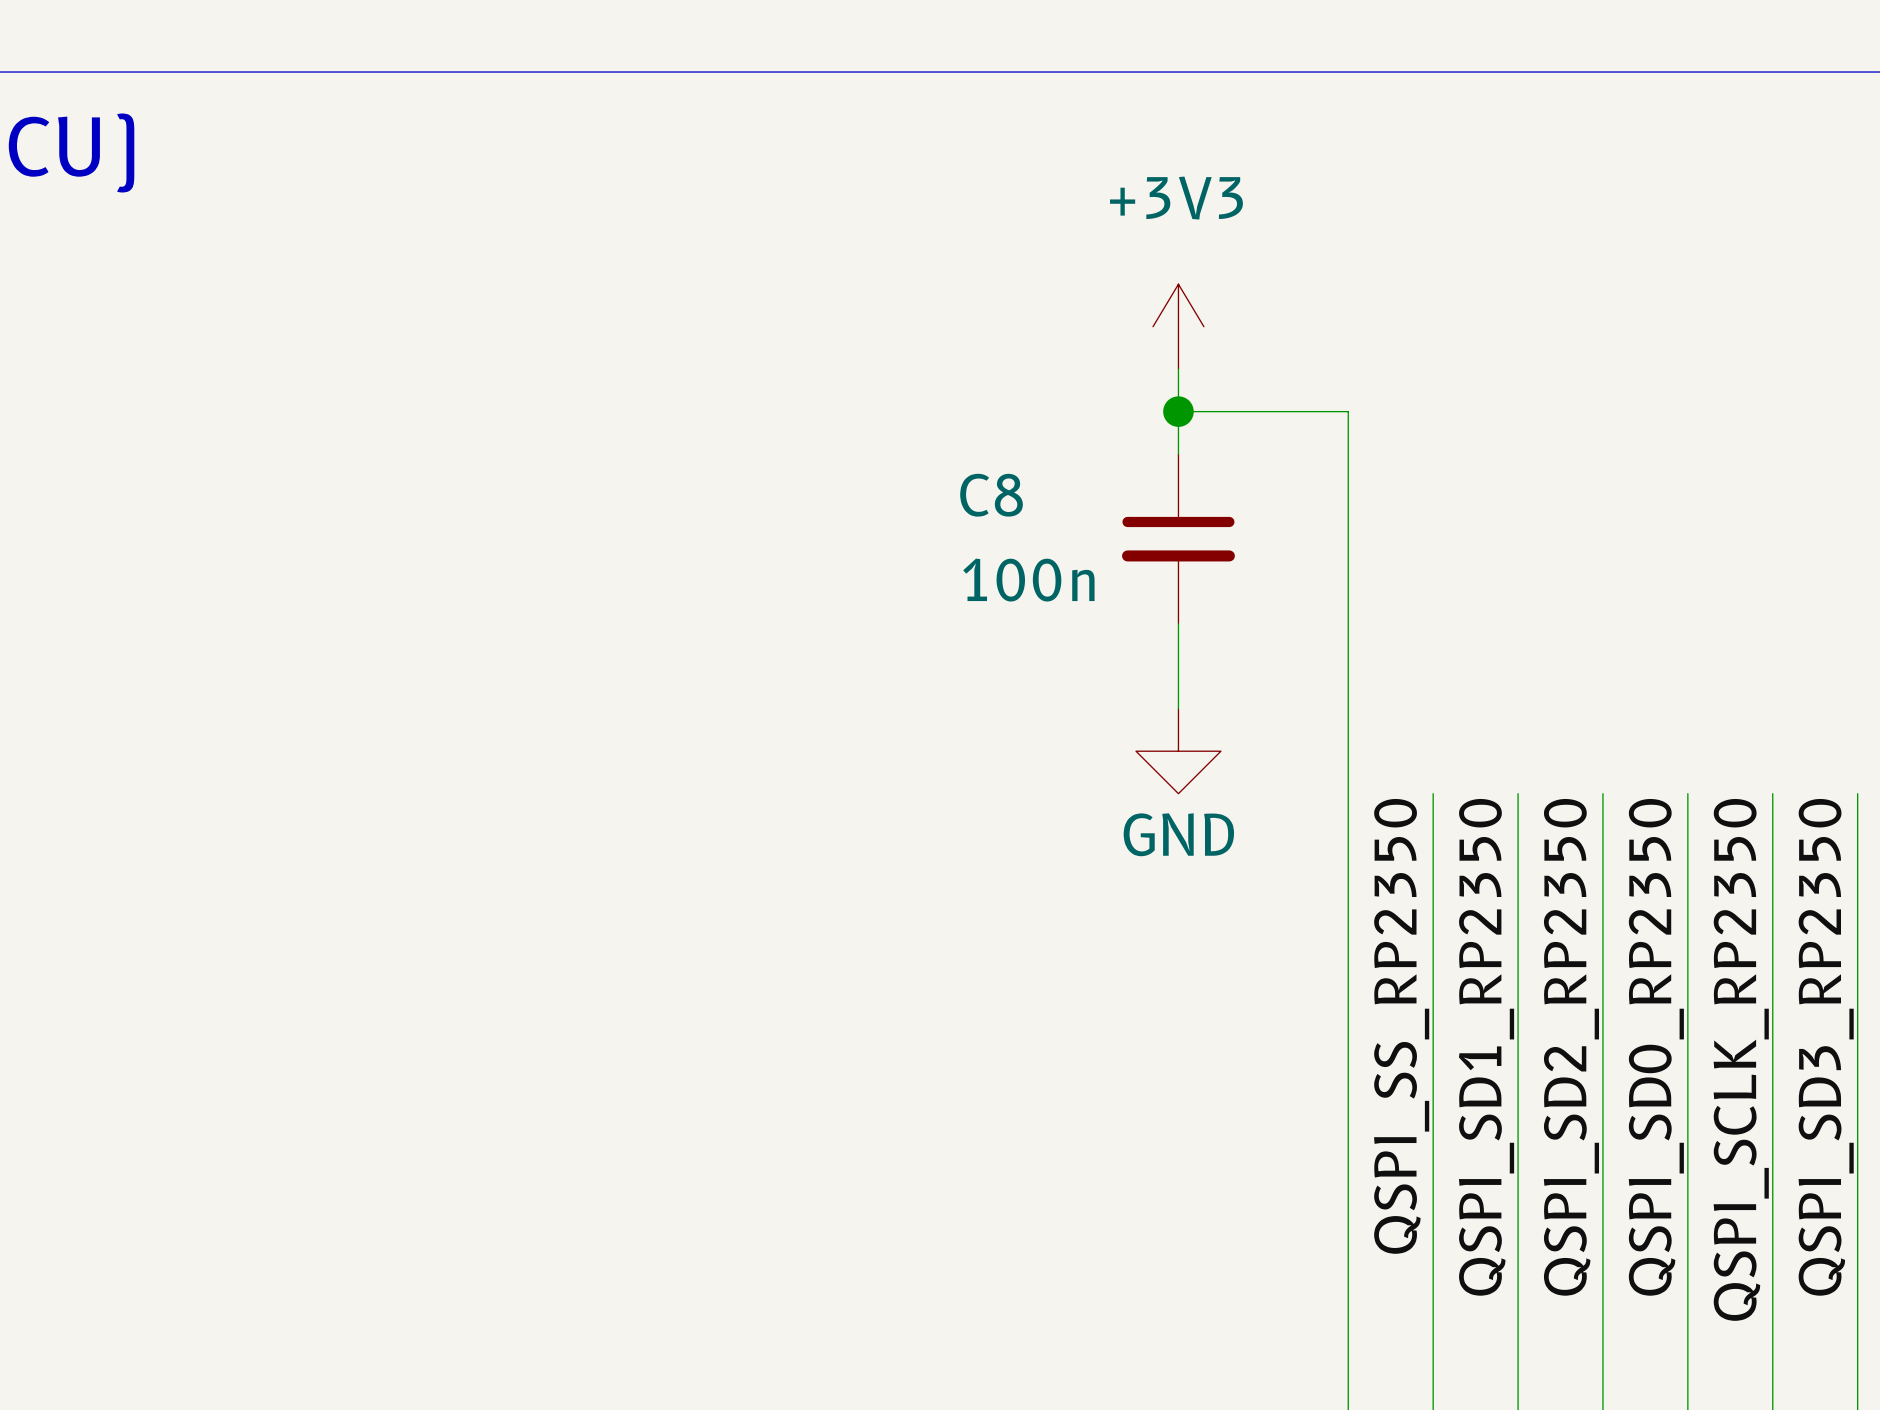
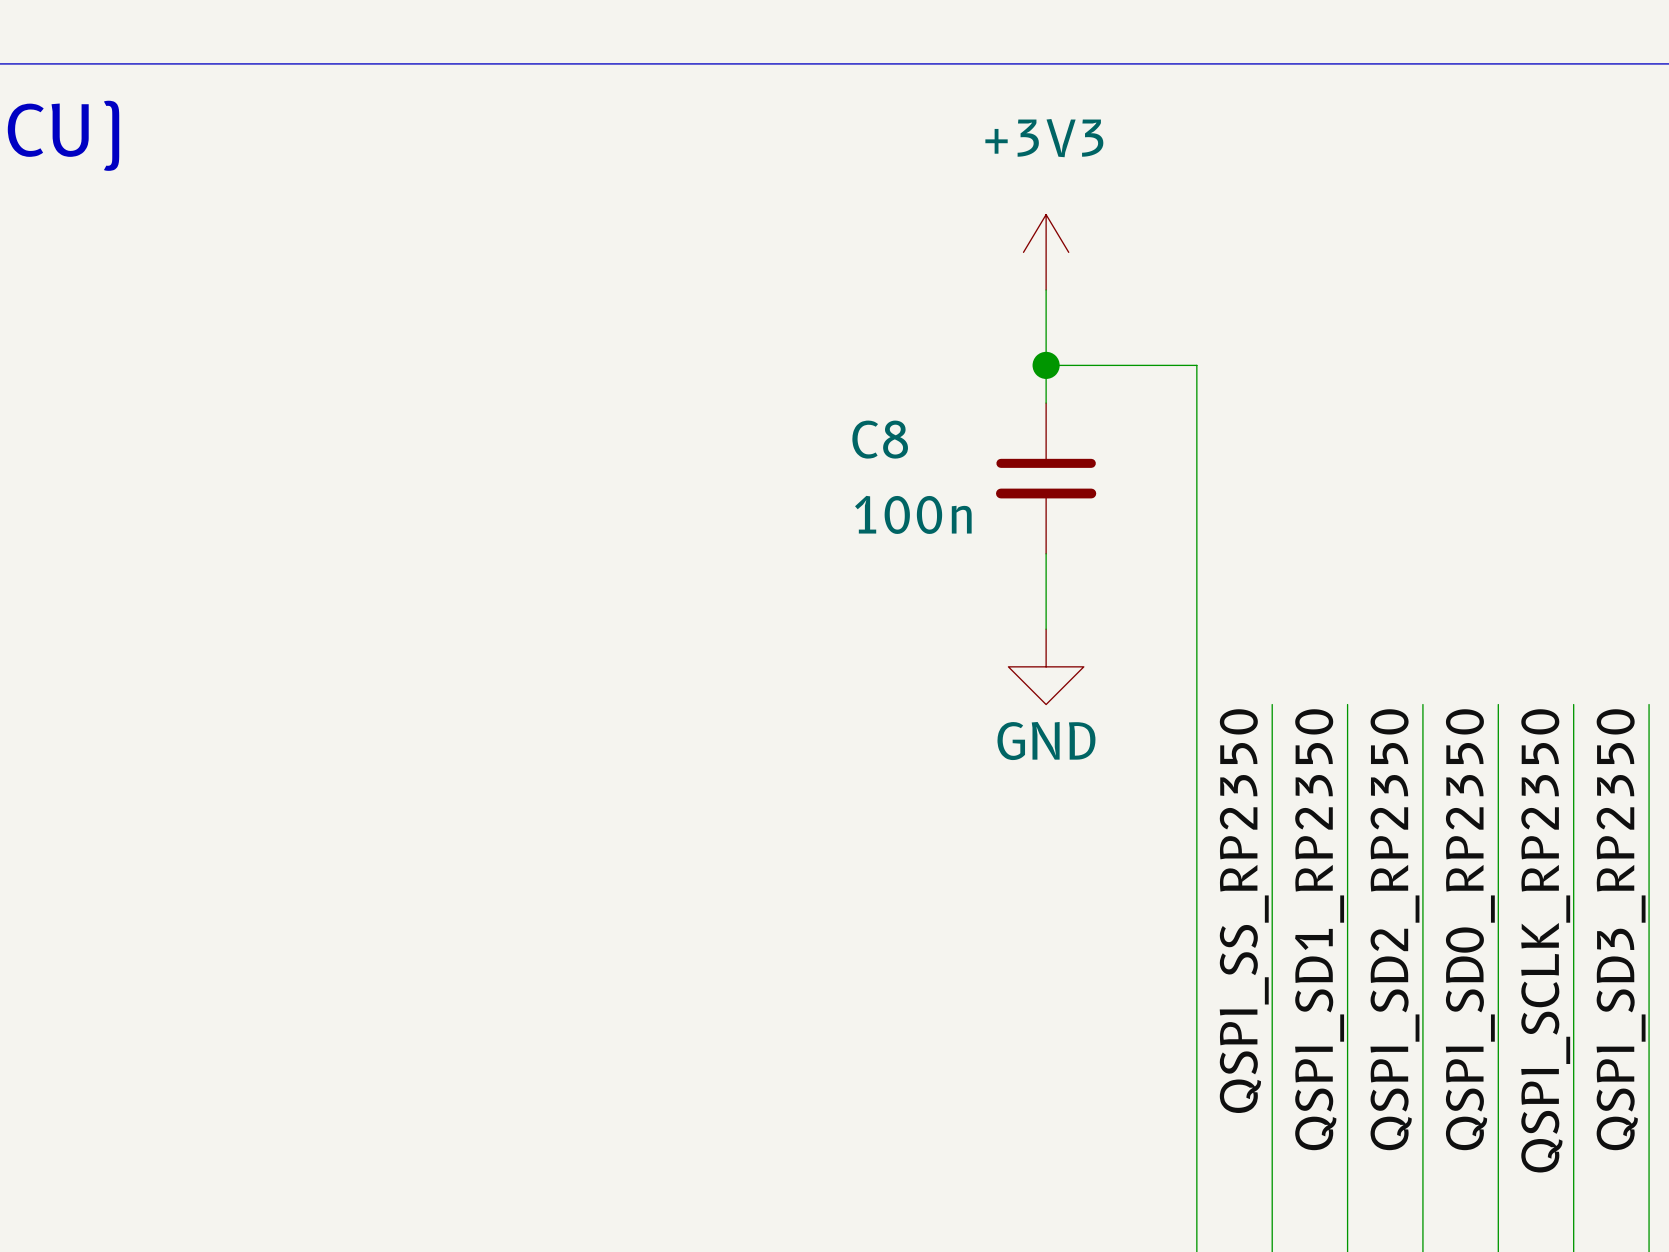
power symbol position: +3V3 (1178, 326) -> +3V3 (1046, 252)

